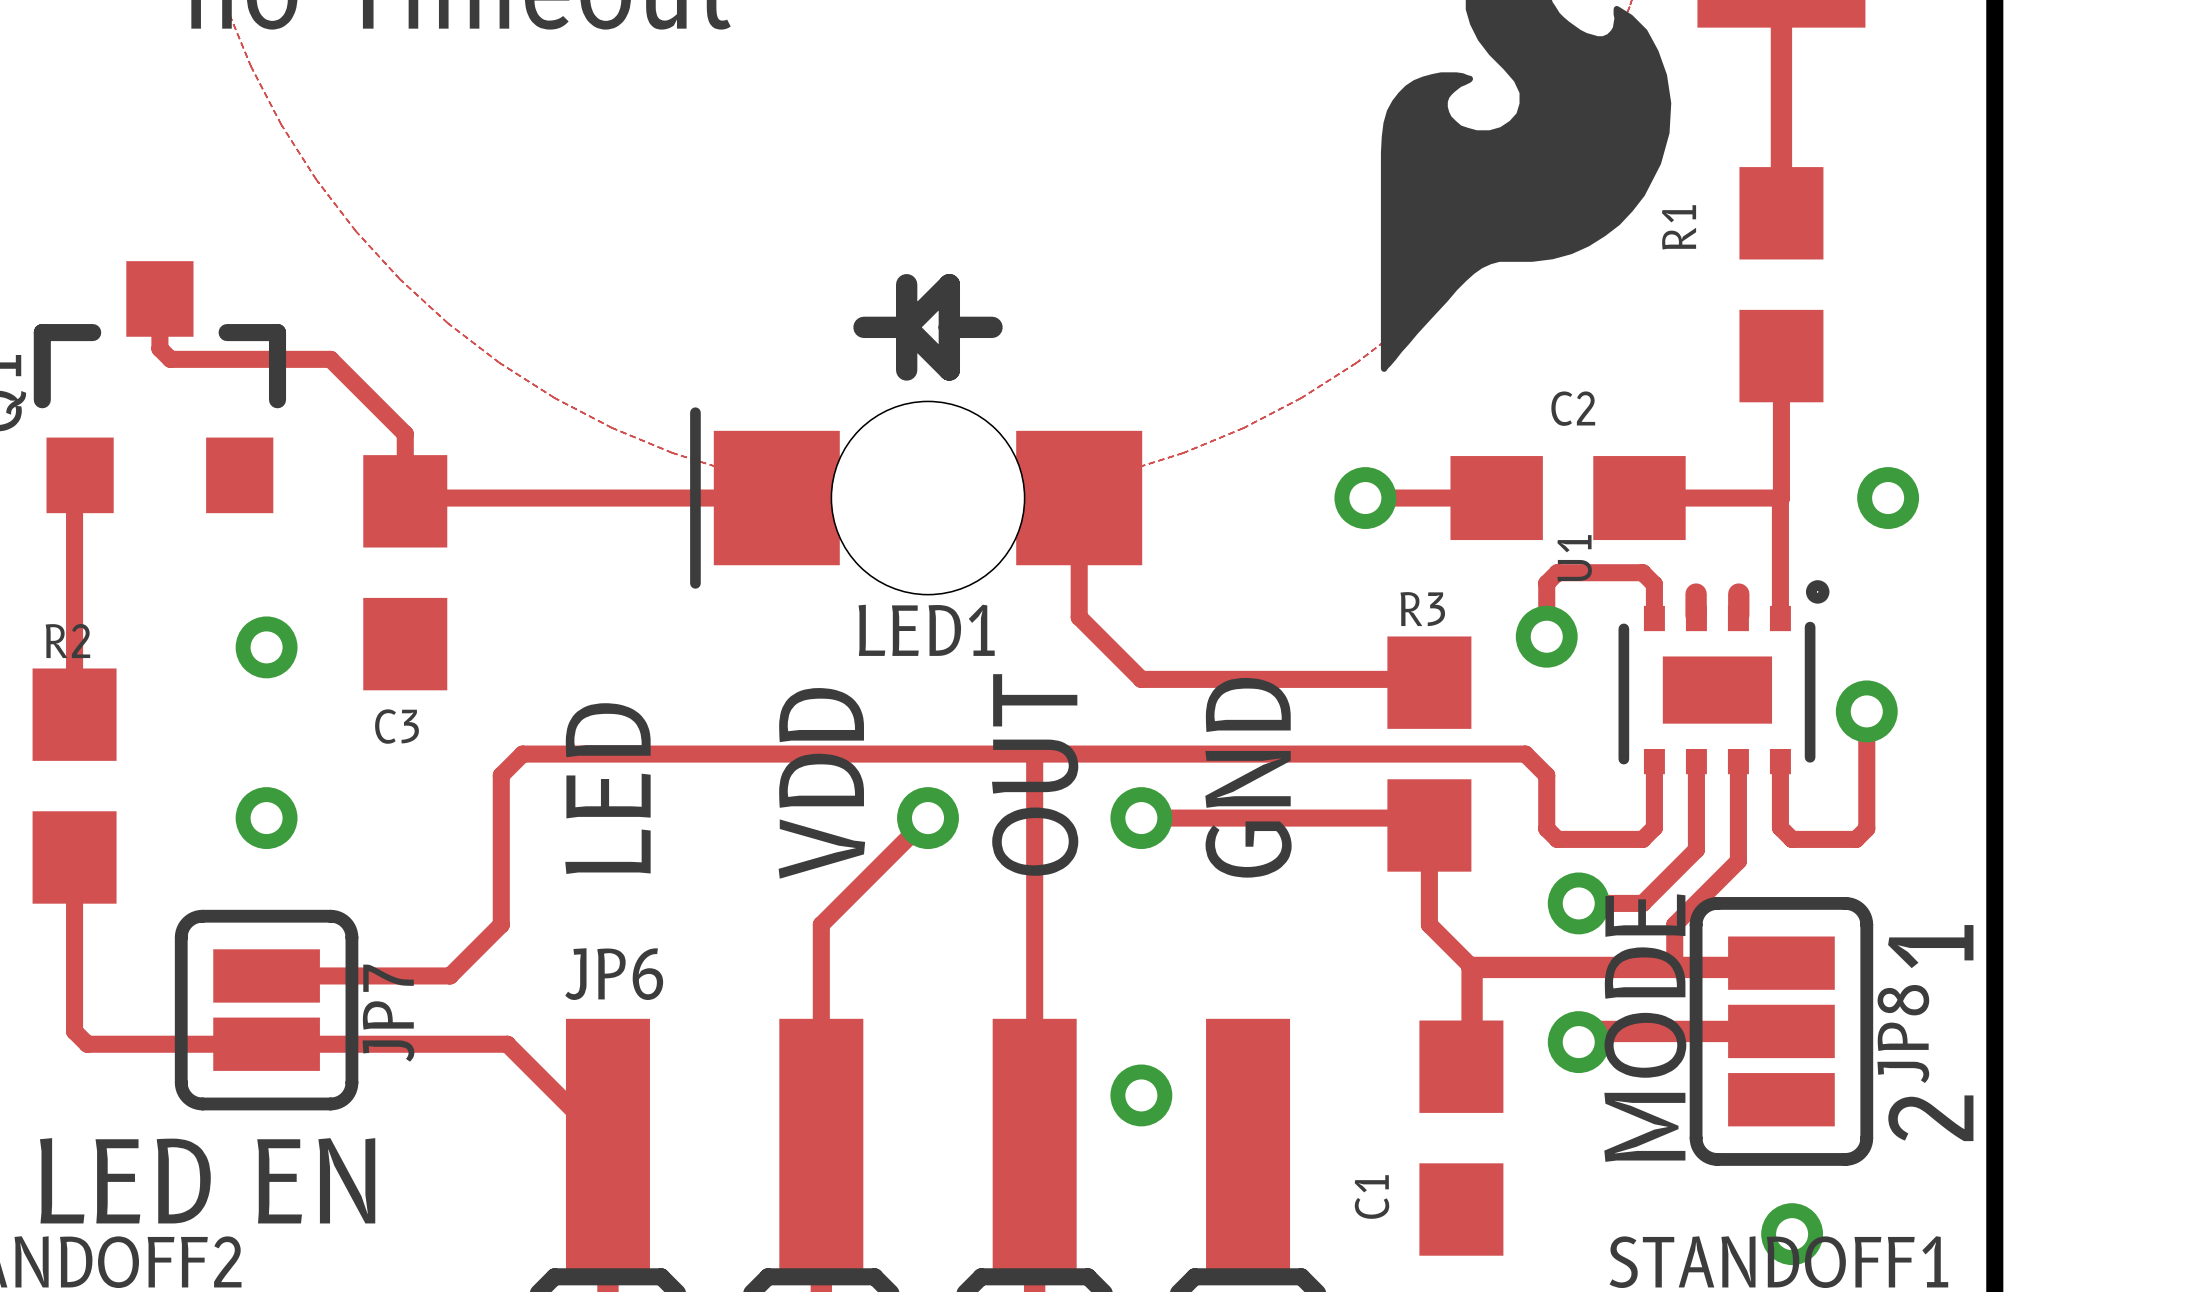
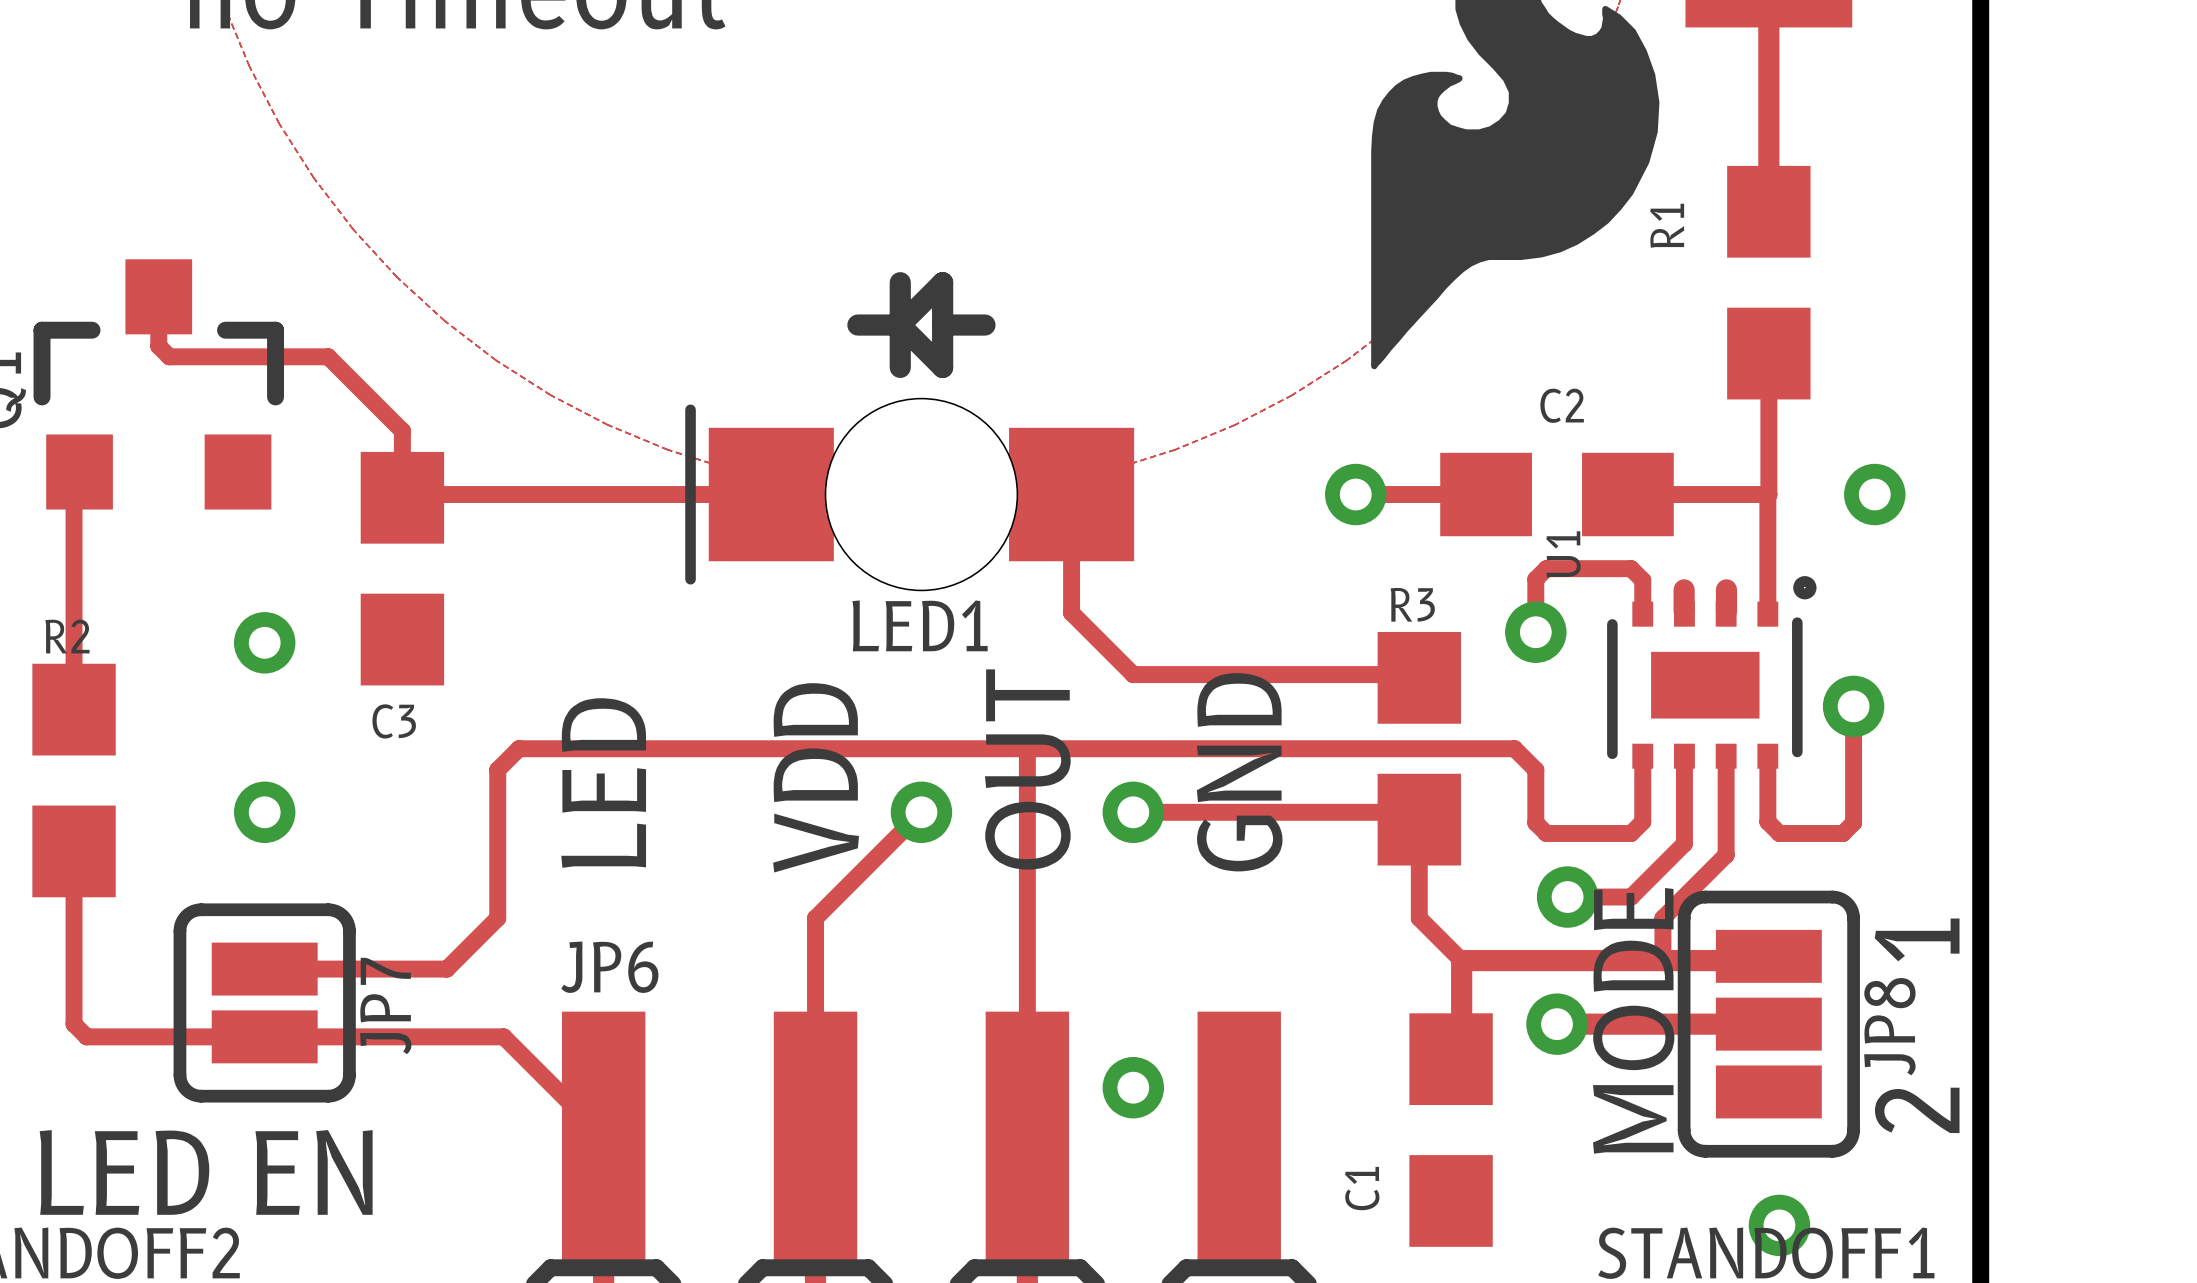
via position: (1578, 1042) -> (1557, 1024)

